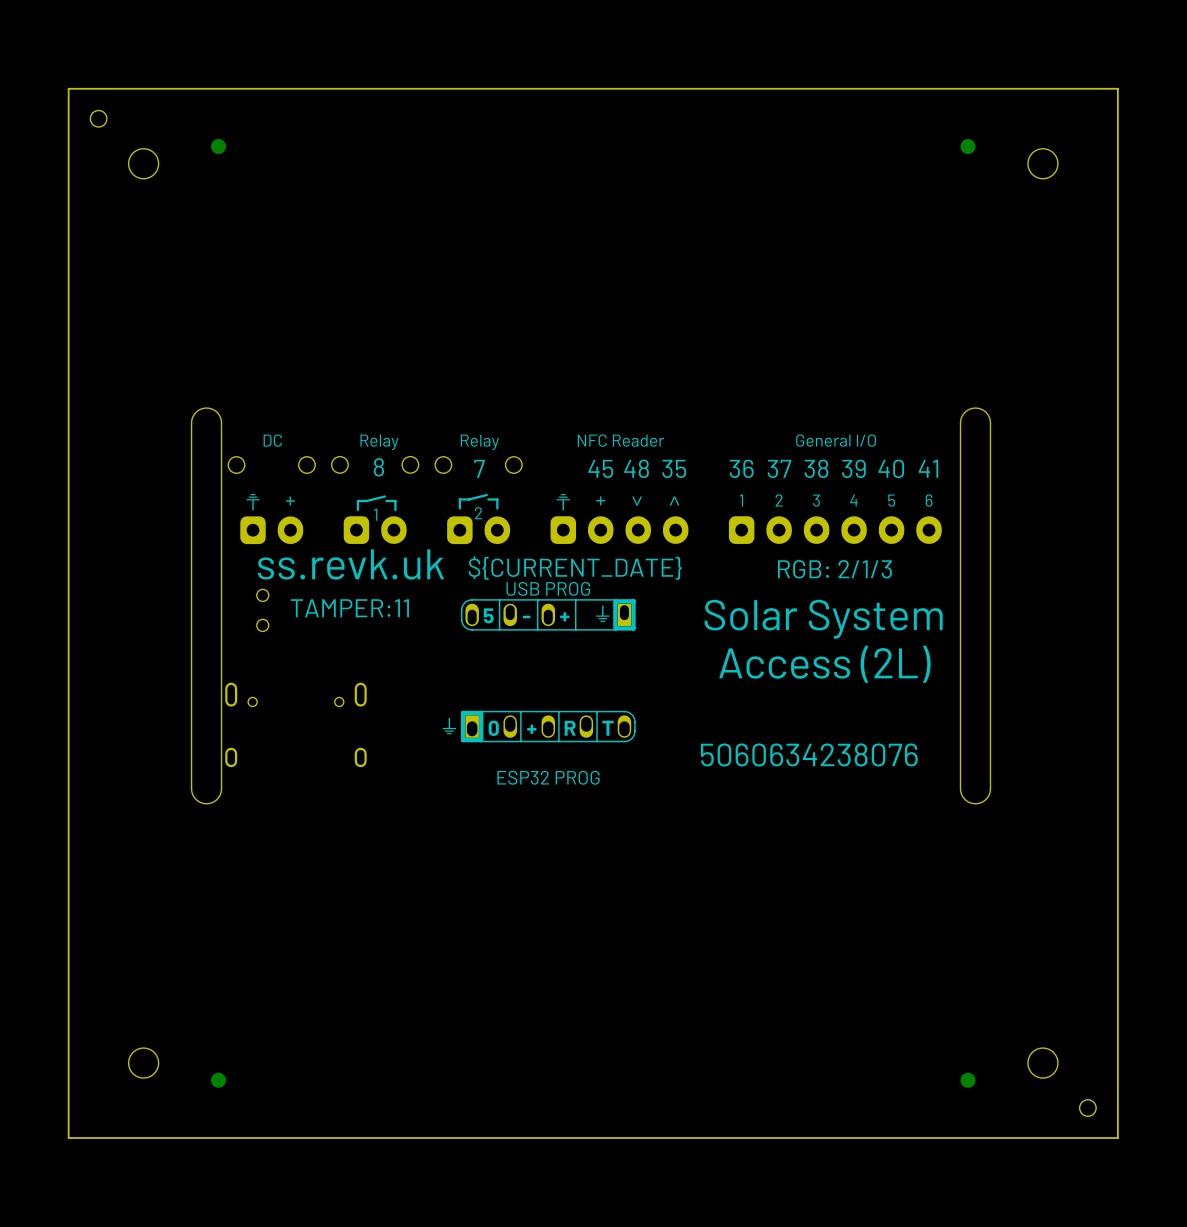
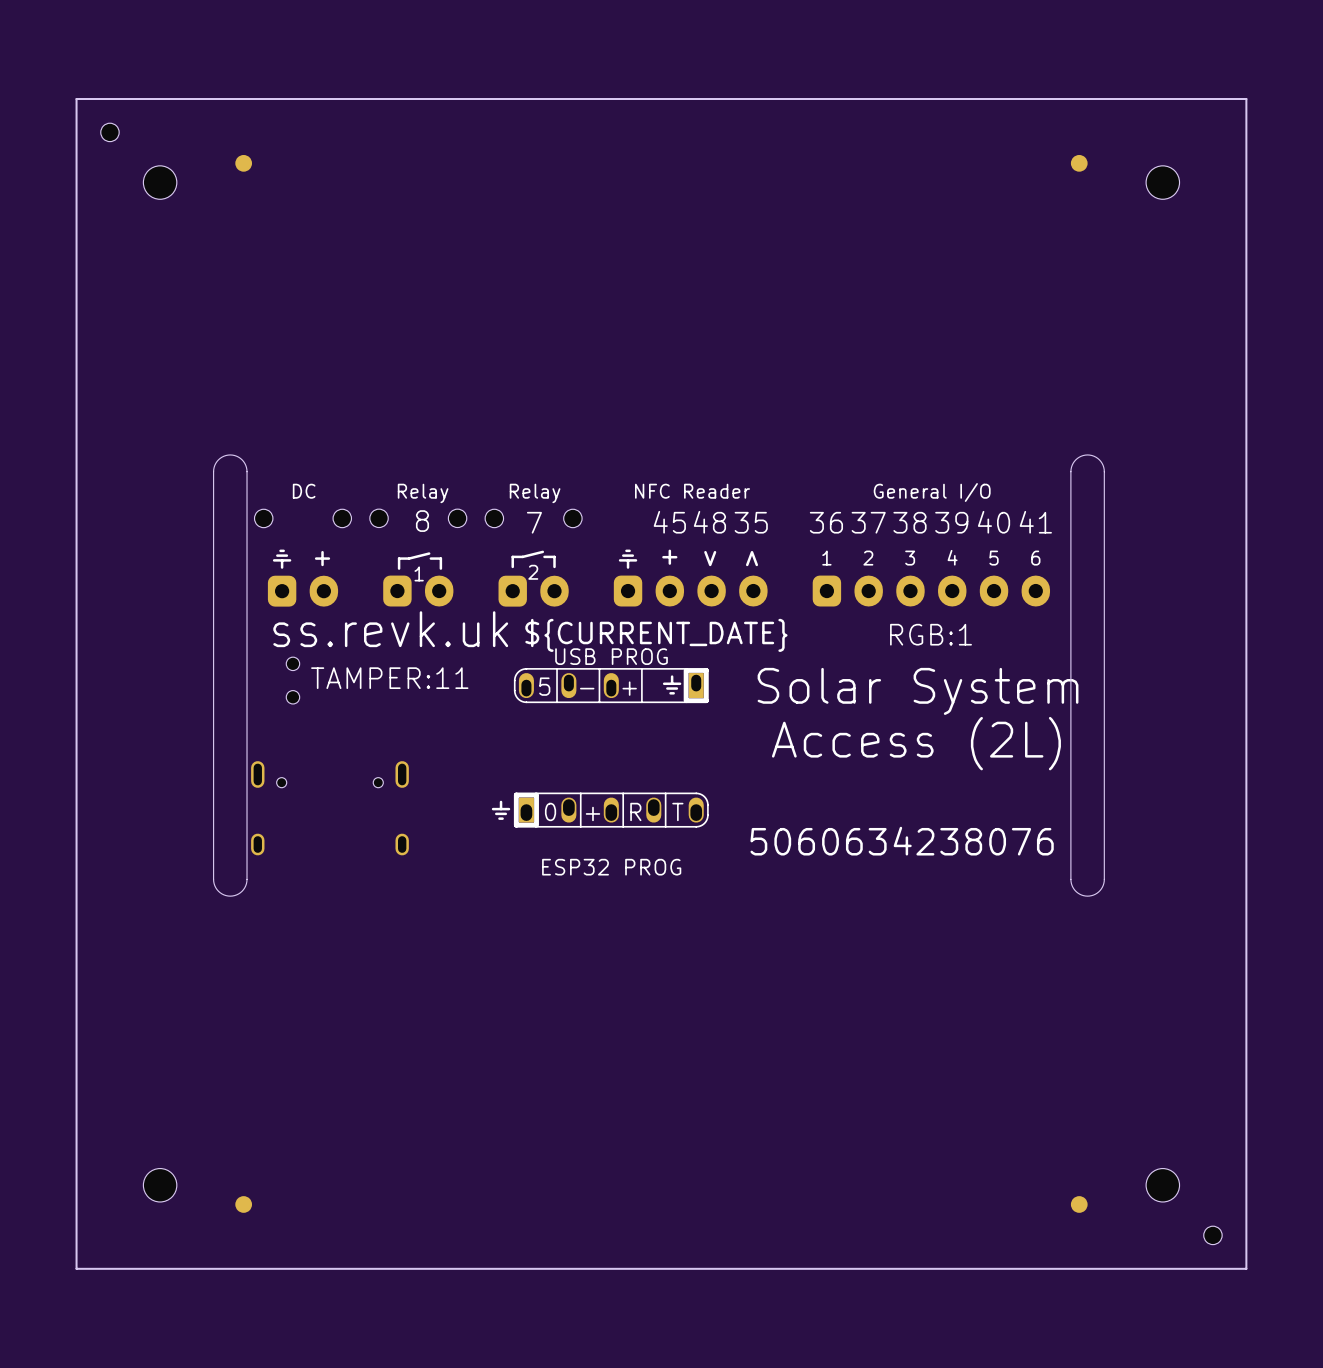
text: RGB: 2/1/3 (834, 569) -> RGB:1 (931, 634)

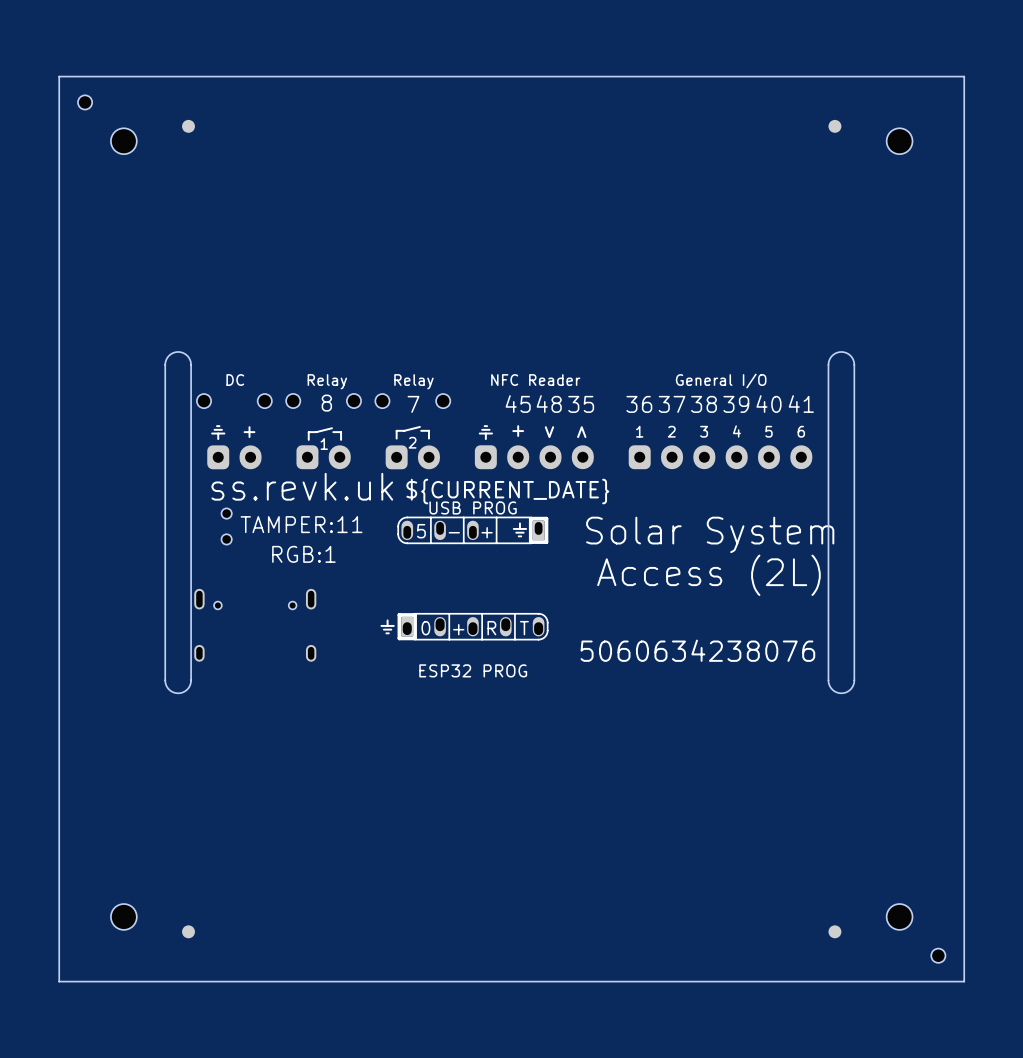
text: RGB:1 (931, 634) -> none
text: none -> RGB:1 (303, 554)

